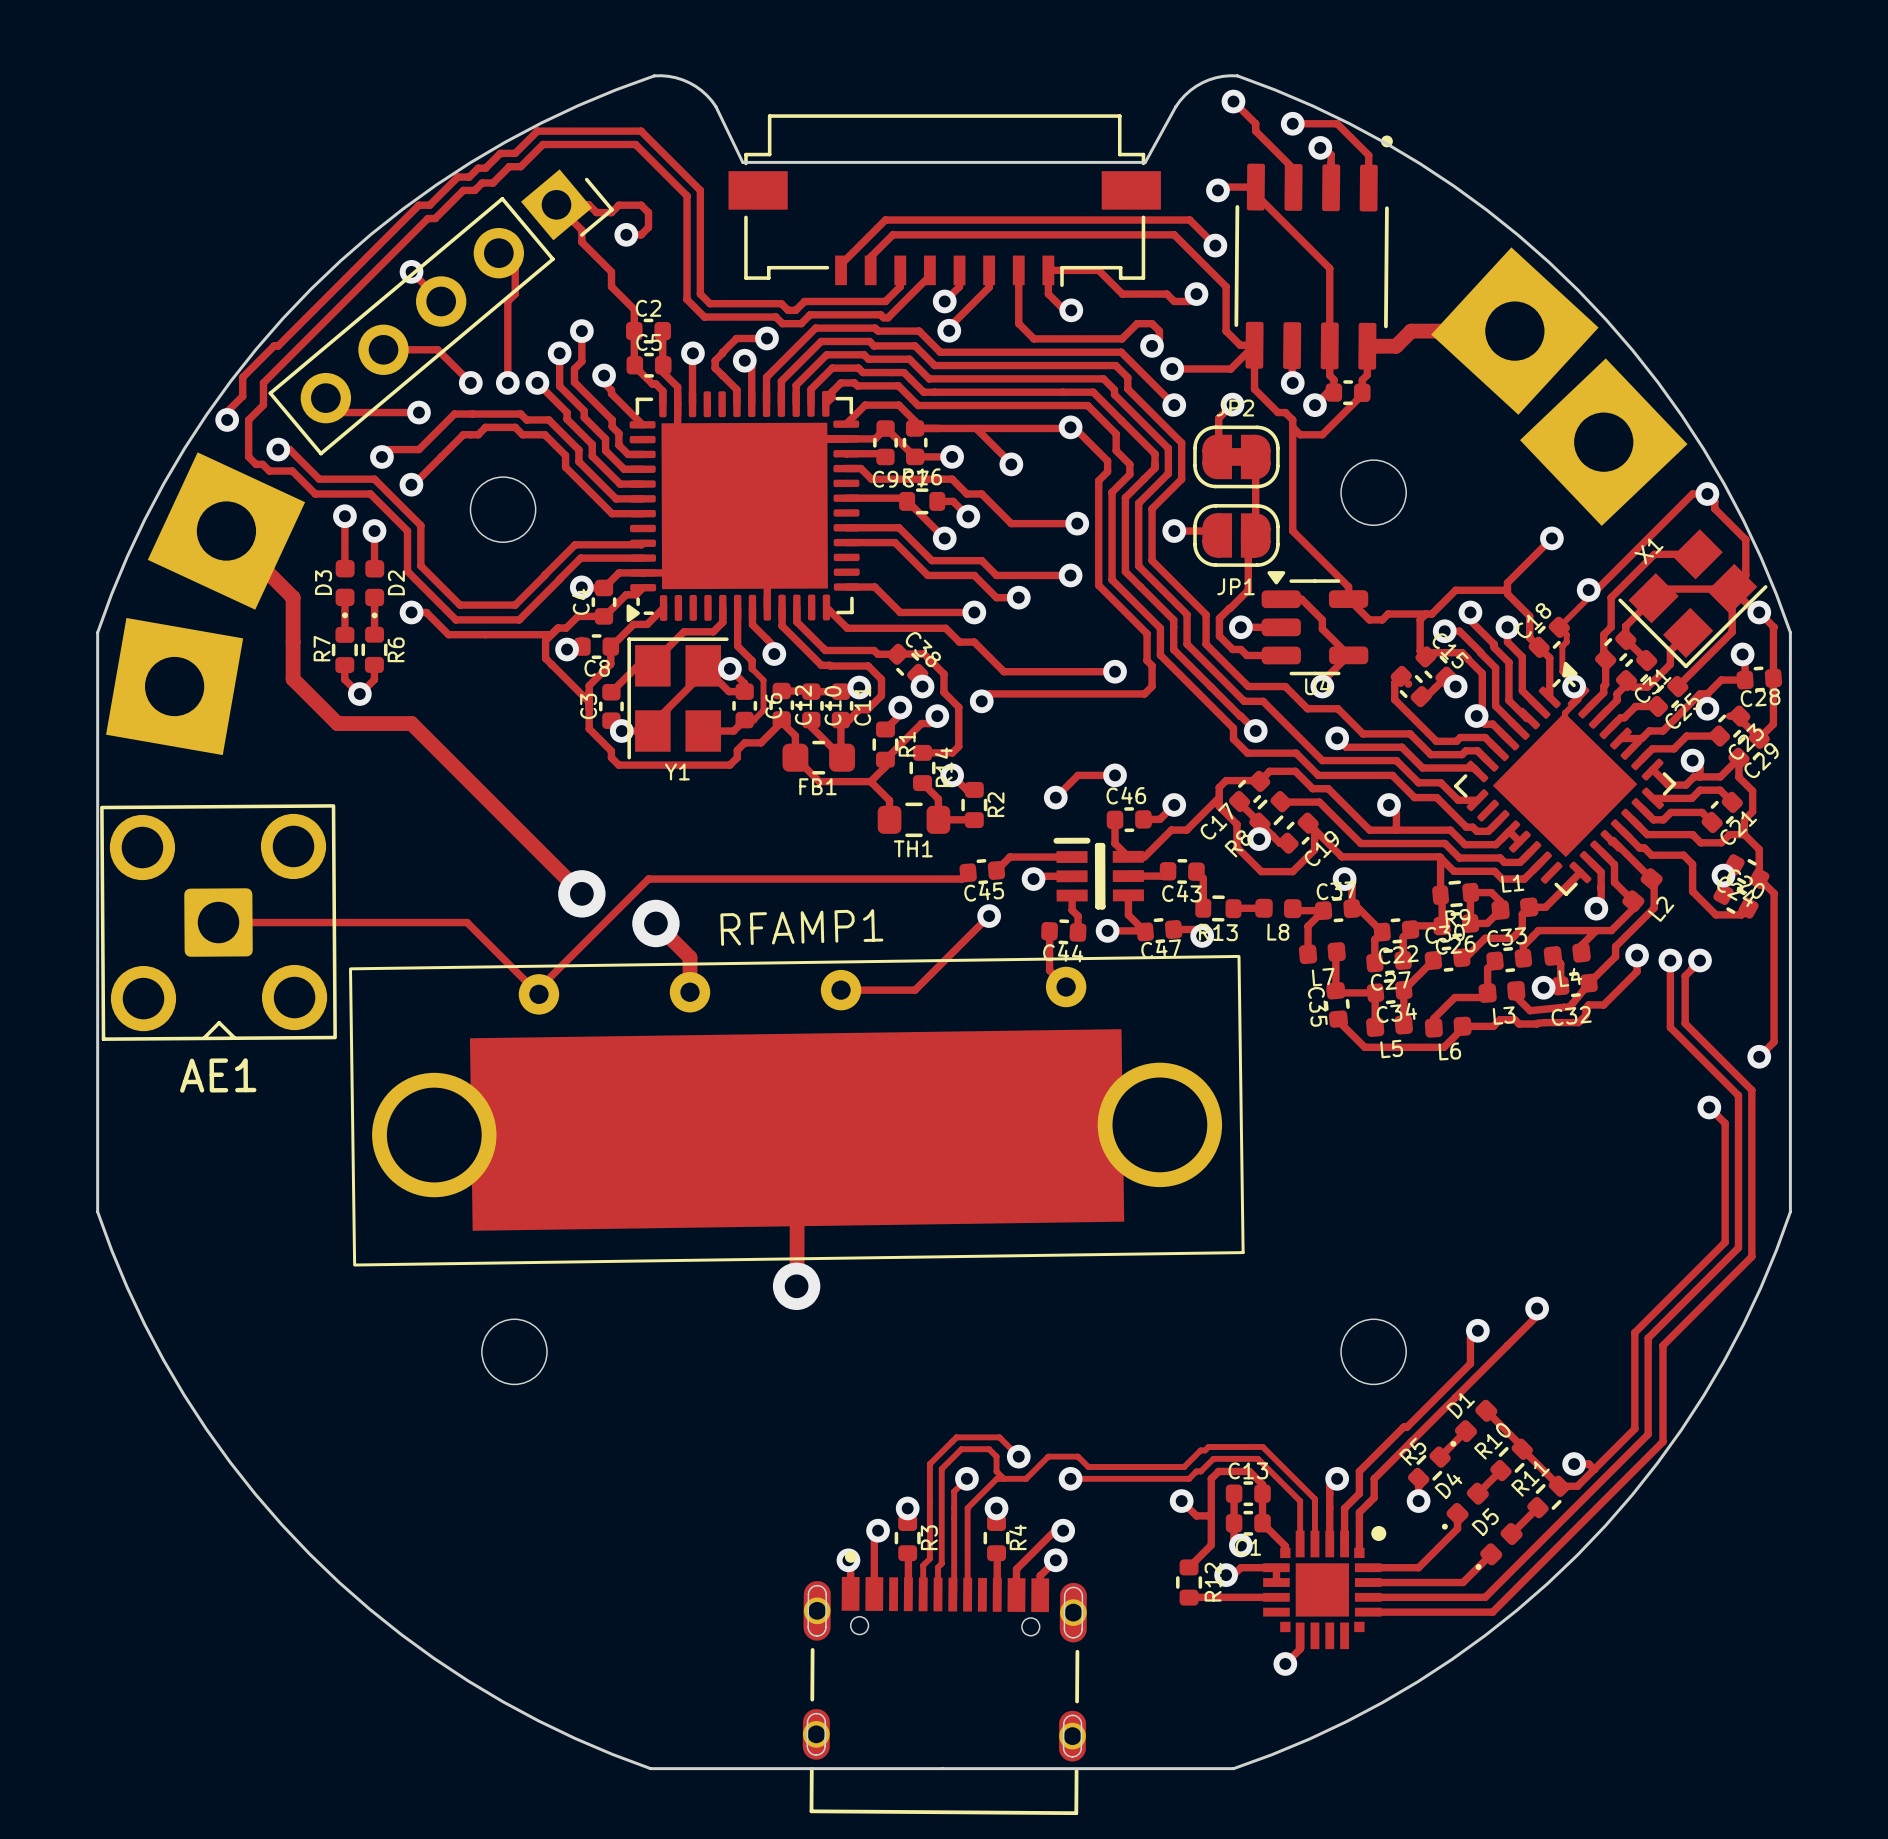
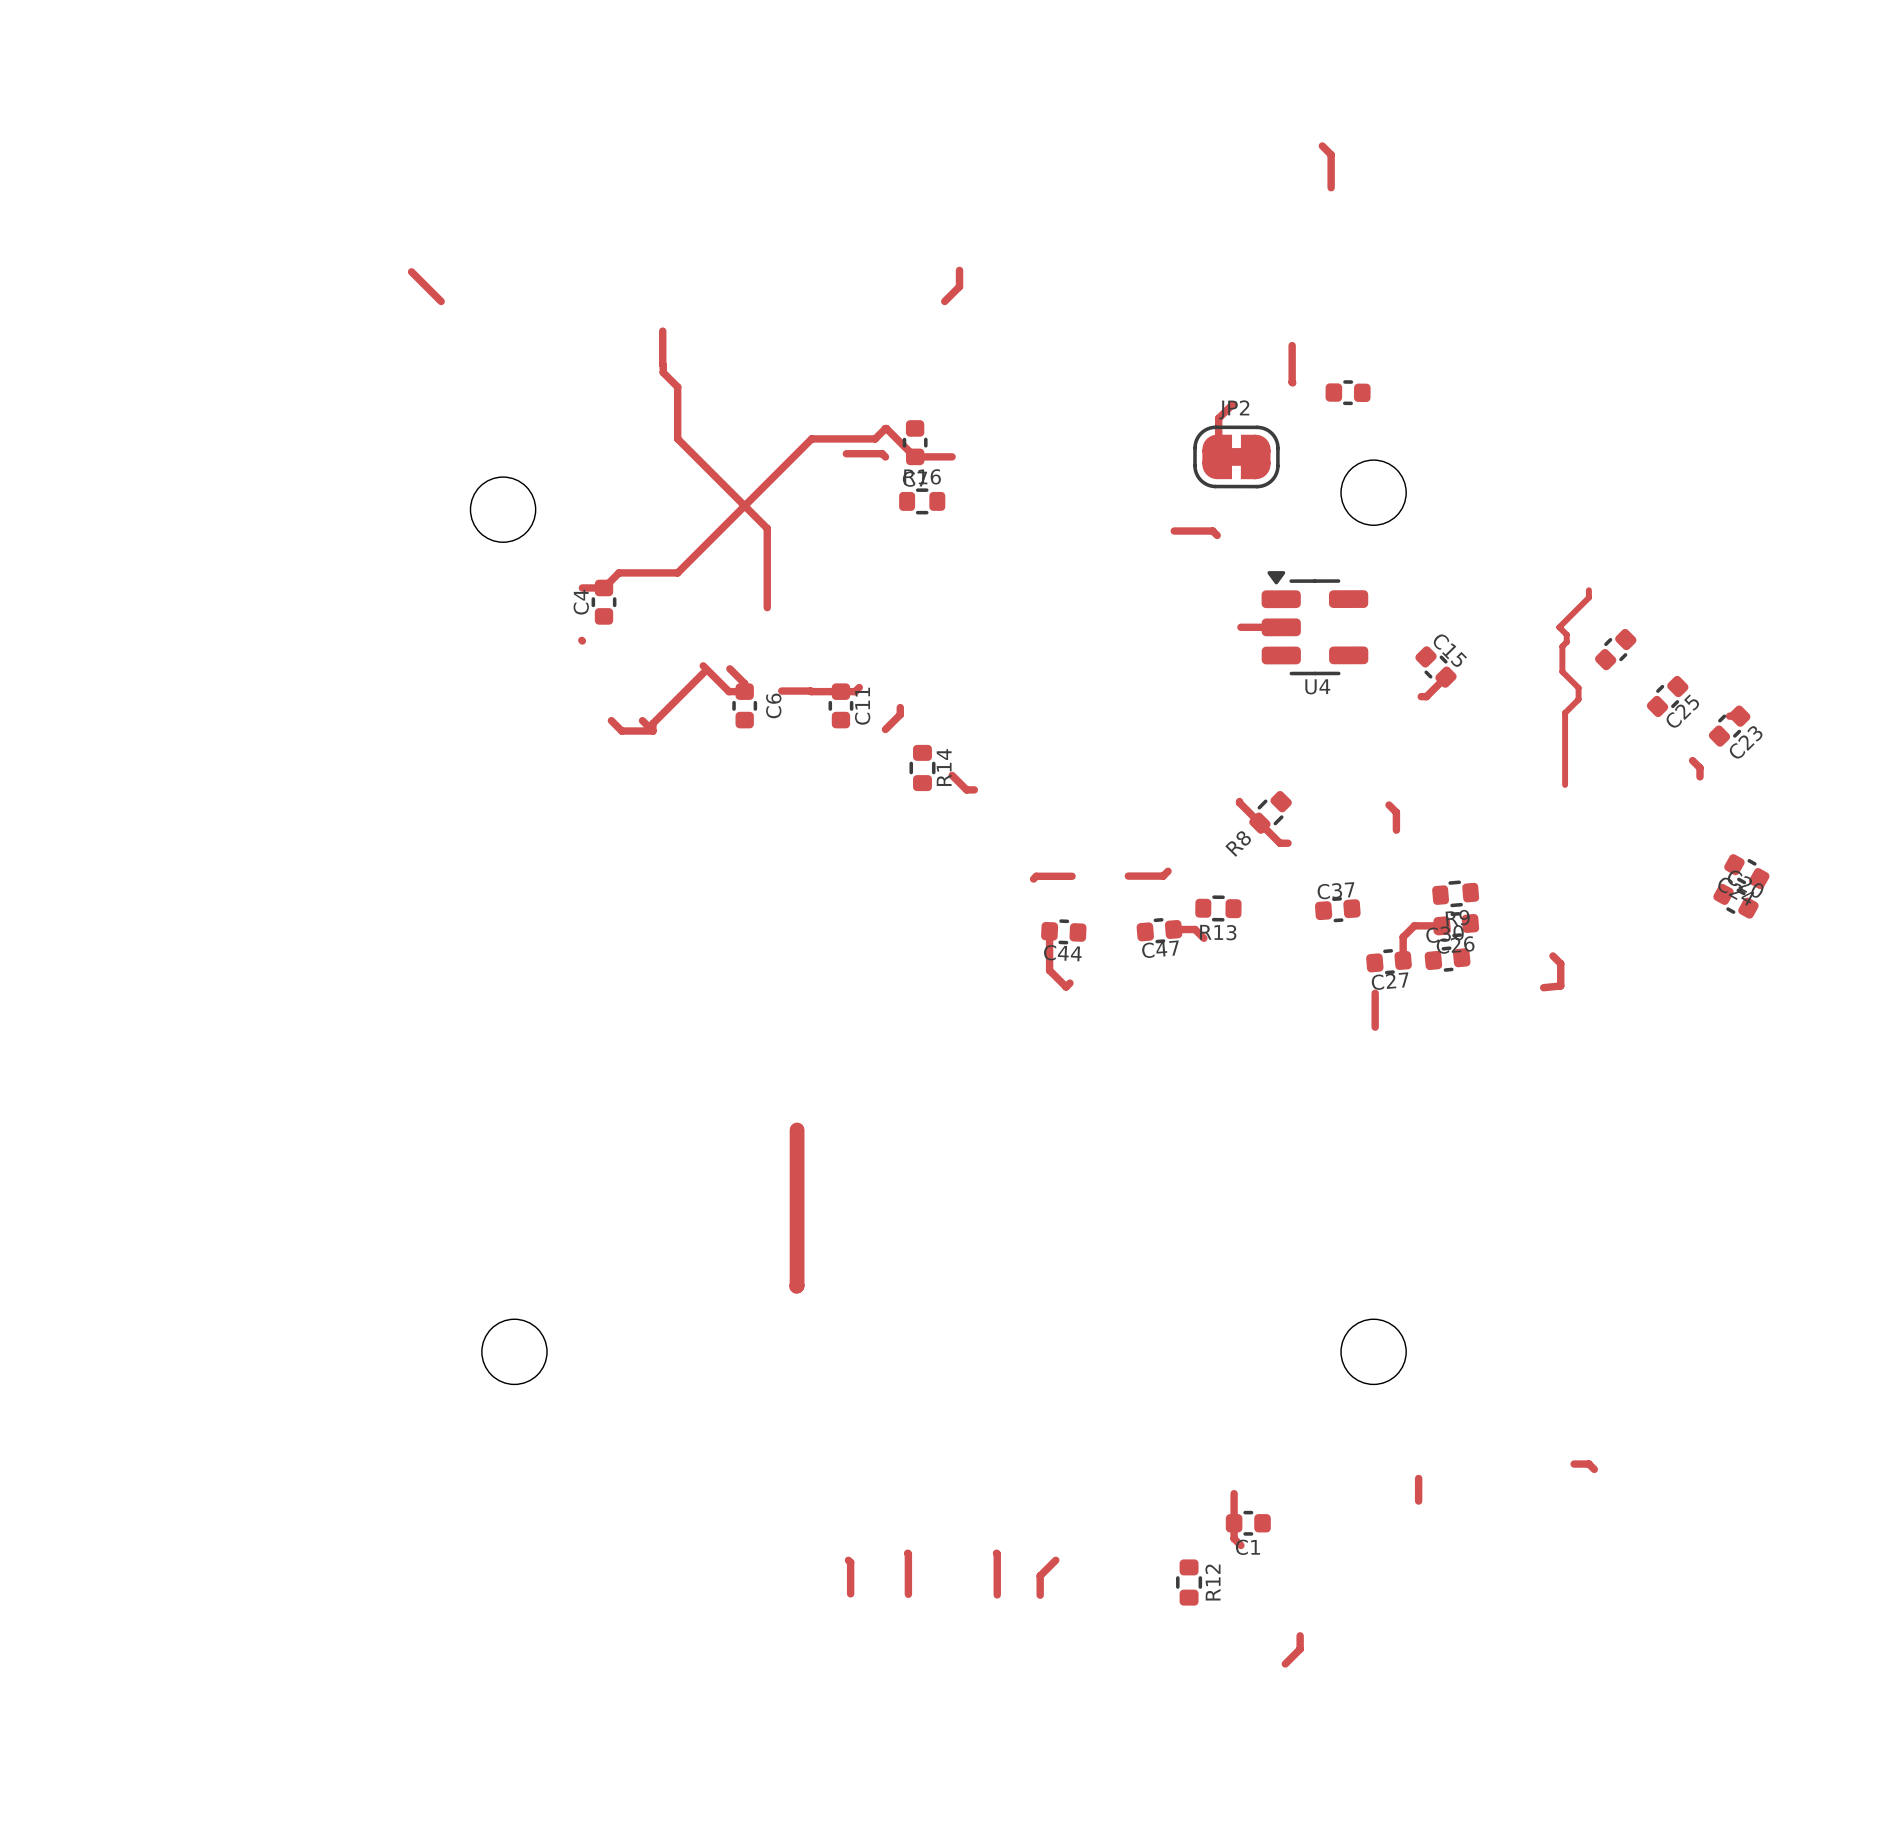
board edge: (654, 75) (578, 105) (541, 122) (470, 162) (403, 208) (340, 261) (282, 318) (230, 381) (184, 448) (144, 519) (127, 556) (97, 632) (97, 1211) (127, 1287) (163, 1360) (206, 1429) (255, 1494) (309, 1554) (369, 1609) (401, 1634) (467, 1680) (538, 1720) (612, 1754) (650, 1768) (1233, 1768) (1309, 1739) (1346, 1721) (1417, 1681) (1484, 1635) (1547, 1583) (1605, 1525) (1657, 1463) (1703, 1395) (1743, 1324) (1776, 1250) (1790, 1211) (1790, 632) (1760, 556) (1724, 484) (1681, 415) (1632, 350) (1578, 290) (1548, 262) (1486, 210) (1420, 163) (1349, 123) (1275, 90) (1237, 75) (1230, 75) (1209, 79) (1196, 86) (1184, 95) (1175, 106) (1145, 162) (742, 162) (715, 106) (706, 95) (695, 86) (682, 79) (668, 76) (654, 75) -> none
track: (1233, 101) (1255, 123) (1255, 131) (1293, 168) (1293, 187) -> none
via: (1233, 101) -> none
track: (1292, 123) (1337, 123) (1368, 155) (1368, 188) -> none
via: (1292, 123) -> none
via: (1320, 147) -> none
via: (1217, 190) -> none
track: (1218, 190) (1222, 187) (1255, 187) (1255, 194) (1329, 268) (1329, 375) (1333, 379) (1333, 392) (1327, 392) (1314, 405) -> none
part: (944, 200) -> none
track: (626, 234) (641, 234) (648, 227) (648, 212) (641, 205) (618, 205) (611, 212) (596, 212) (588, 204) (556, 204) (581, 230) (581, 242) (611, 271) (611, 286) (634, 309) (634, 366) (652, 384) (655, 384) (662, 391) (662, 404) -> none
via: (626, 234) -> none
track: (1215, 245) (1189, 220) (885, 220) (841, 264) (841, 270) -> none
via: (1215, 245) -> none
part: (1313, 252) -> none
track: (498, 253) (515, 269) (515, 294) (507, 301) (507, 382) (500, 382) -> none
track: (870, 270) (870, 257) (892, 234) (1174, 234) (1226, 286) (1226, 331) (1240, 345) (1254, 345) -> none
track: (900, 270) (900, 286) (885, 301) (804, 301) (795, 310) (788, 310) (781, 303) (709, 303) (700, 294) (700, 190) (641, 131) (537, 131) (515, 153) (500, 153) (485, 168) (478, 168) (469, 177) (457, 177) (429, 205) (418, 205) (278, 345) (274, 345) (242, 377) (242, 396) (226, 412) (227, 419) -> none
track: (929, 270) (929, 275) (888, 317) (883, 317) (880, 314) (810, 314) (801, 323) (782, 323) (775, 317) (704, 317) (687, 299) (687, 195) (635, 144) (542, 144) (520, 166) (509, 166) (493, 183) (482, 183) (474, 190) (463, 190) (435, 218) (427, 218) (263, 382) (263, 405) (248, 419) (248, 456) (256, 464) (262, 464) (269, 471) (292, 471) (315, 494) (370, 494) (407, 531) (407, 571) (455, 619) (519, 619) (580, 558) (643, 558) -> none
track: (989, 270) (989, 287) (949, 327) (949, 330) -> none
track: (1018, 270) (1018, 323) (1033, 338) (1122, 338) (1137, 323) (1152, 323) (1159, 331) (1159, 338) (1152, 345) -> none
via: (411, 271) -> none
track: (1196, 294) (1189, 301) (1174, 301) (1166, 294) (1122, 294) (1098, 270) (1048, 270) (1048, 294) (1063, 308) (1070, 308) -> none
via: (1196, 294) -> none
via: (944, 301) -> none
via: (1071, 310) -> none
part: (441, 312) -> none
via: (949, 330) -> none
track: (581, 331) (581, 361) (574, 368) (574, 382) (612, 419) (612, 426) (618, 433) (618, 445) (628, 454) (642, 454) -> none
via: (581, 331) -> none
C2: (648, 331) -> none
track: (1514, 331) (1411, 331) (1396, 346) (1367, 346) (1367, 374) (1362, 380) (1362, 394) (1322, 434) (1300, 434) (1292, 427) -> none
part: (1514, 331) -> none
track: (766, 338) (736, 338) (715, 360) (715, 368) (736, 389) (736, 404) -> none
via: (766, 338) -> none
via: (1152, 345) -> none
track: (1254, 345) (1254, 389) (1277, 412) (1285, 412) (1292, 419) (1292, 531) (1348, 586) (1348, 599) (1369, 619) (1382, 619) (1388, 614) (1431, 614) (1455, 590) (1507, 590) -> none
track: (1254, 345) (1230, 368) (1172, 368) -> none
track: (383, 349) (437, 349) (470, 382) -> none
track: (559, 353) (559, 386) (584, 410) (584, 417) (605, 438) (605, 450) (624, 469) (642, 469) -> none
via: (559, 353) -> none
track: (692, 353) (692, 404) -> none
via: (692, 353) -> none
track: (744, 360) (751, 367) (751, 404) -> none
via: (744, 360) -> none
C5: (649, 365) -> none
via: (1172, 368) -> none
track: (604, 375) (604, 382) (611, 390) (611, 393) (642, 424) -> none
via: (604, 375) -> none
via: (470, 382) -> none
via: (507, 382) -> none
track: (537, 382) (567, 412) (567, 419) (592, 444) (592, 456) (620, 484) (642, 484) -> none
via: (537, 382) -> none
via: (1292, 382) -> none
track: (325, 398) (340, 412) (418, 412) -> none
track: (781, 403) (781, 381) (821, 341) (869, 341) (874, 345) (915, 345) (934, 365) (1115, 365) (1127, 377) (1127, 389) (1181, 442) (1181, 479) (1152, 508) (1152, 560) (1206, 614) (1206, 644) (1248, 686) (1285, 686) (1307, 708) (1337, 708) (1363, 733) (1410, 733) (1430, 754) (1462, 754) (1465, 750) (1477, 750) (1487, 760) -> none
track: (796, 403) (796, 385) (826, 354) (864, 354) (868, 359) (909, 359) (929, 378) (1103, 378) (1114, 389) (1114, 394) (1168, 448) (1168, 473) (1138, 503) (1138, 566) (1187, 614) (1187, 644) (1244, 701) (1263, 701) (1322, 760) (1396, 760) (1418, 782) (1440, 782) (1458, 800) (1477, 800) -> none
track: (810, 403) (810, 389) (832, 368) (858, 368) (862, 372) (904, 372) (923, 392) (1093, 392) (1155, 453) (1155, 468) (1125, 497) (1125, 571) (1173, 620) (1173, 649) (1255, 730) -> none
track: (825, 403) (831, 397) (831, 392) (841, 382) (854, 382) (857, 385) (898, 385) (918, 405) (1087, 405) (1116, 433) (1116, 450) (1129, 464) (1129, 474) (1112, 492) (1112, 579) (1160, 628) (1160, 655) (1233, 728) (1233, 739) (1247, 753) (1296, 753) (1318, 775) (1392, 775) (1414, 797) (1436, 797) (1466, 827) (1472, 827) (1476, 831) (1488, 831) (1498, 820) -> none
track: (766, 404) (766, 377) (815, 328) (875, 328) (878, 331) (919, 331) (940, 352) (1121, 352) (1174, 405) -> none
via: (1232, 404) -> none
via: (1174, 405) -> none
via: (1314, 405) -> none
via: (418, 412) -> none
via: (227, 419) -> none
track: (846, 424) (865, 405) (898, 405) (915, 421) (915, 428) (1073, 427) (1107, 461) (1107, 471) (1098, 480) (1098, 585) (1147, 633) (1147, 660) (1152, 665) (1152, 686) (1144, 693) (989, 693) (981, 701) -> none
via: (1070, 427) -> none
track: (976, 428) (1011, 464) -> none
C9: (885, 442) -> none
part: (1603, 442) -> none
track: (278, 449) (289, 449) (319, 479) (374, 479) (420, 525) (420, 565) (460, 605) (515, 605) (575, 544) (643, 543) -> none
via: (278, 449) -> none
track: (381, 456) (389, 449) (418, 449) (454, 414) (520, 414) (526, 419) (548, 419) (578, 449) (578, 461) (616, 498) (642, 498) -> none
via: (381, 456) -> none
via: (952, 456) -> none
track: (1255, 456) (1255, 535) (1248, 542) (1248, 590) (1219, 618) (1219, 636) (1232, 649) (1240, 649) (1246, 655) (1281, 655) -> none
via: (1011, 464) -> none
track: (846, 468) (860, 468) (871, 479) (952, 479) (966, 494) (981, 494) (1011, 523) (1077, 523) -> none
via: (411, 484) -> none
track: (411, 486) (463, 434) (478, 434) (485, 427) (515, 427) (522, 434) (544, 434) (565, 455) (565, 467) (612, 513) (642, 513) -> none
via: (1707, 494) -> none
track: (846, 498) (903, 498) (907, 501) -> none
track: (907, 501) (944, 538) -> none
track: (937, 501) (953, 501) (968, 516) -> none
part: (743, 506) -> none
track: (344, 516) (344, 568) -> none
via: (344, 516) -> none
via: (968, 516) -> none
via: (1077, 523) -> none
track: (846, 527) (899, 527) (931, 560) (981, 560) (996, 575) (1070, 575) -> none
track: (226, 531) (293, 597) (293, 679) (337, 723) (411, 723) (581, 893) -> none
part: (226, 531) -> none
track: (374, 531) (374, 568) -> none
via: (374, 531) -> none
via: (1174, 531) -> none
JP1: (1236, 535) -> none
via: (944, 538) -> none
track: (1551, 538) (1507, 582) (1507, 593) (1529, 616) (1529, 637) (1549, 657) (1549, 697) -> none
via: (1551, 538) -> none
track: (846, 542) (895, 542) (927, 575) (974, 575) (996, 597) (1018, 597) -> none
track: (1697, 554) (1654, 554) (1611, 597) (1611, 627) (1603, 634) (1605, 684) (1603, 692) (1589, 707) -> none
via: (1070, 575) -> none
via: (581, 587) -> none
track: (643, 587) (636, 594) (626, 594) (604, 616) (577, 616) (566, 628) (558, 628) (545, 640) (545, 658) (589, 702) -> none
track: (846, 587) (874, 587) (900, 612) (974, 612) -> none
D3: (345, 589) -> none
D2: (374, 589) -> none
track: (1588, 590) (1596, 590) (1692, 494) (1707, 494) (1714, 501) (1714, 508) (1745, 539) (1745, 575) (1732, 589) (1662, 589) (1625, 626) (1625, 639) (1646, 660) -> none
via: (1588, 590) -> none
track: (345, 597) (344, 634) -> none
track: (374, 597) (374, 634) -> none
via: (1018, 597) -> none
X1: (1692, 598) -> none
track: (1281, 599) (1301, 599) (1322, 619) (1322, 629) (1348, 655) (1322, 681) (1322, 686) -> none
track: (722, 607) (722, 622) (713, 631) (683, 631) (652, 662) -> none
track: (737, 607) (737, 646) (752, 660) (752, 668) (763, 680) (763, 710) (753, 720) (744, 720) (733, 731) (703, 731) -> none
track: (752, 607) (752, 624) (774, 646) (774, 654) -> none
track: (782, 607) (782, 625) (821, 665) (868, 666) (881, 679) (881, 695) (867, 709) (859, 709) (848, 720) (840, 720) (840, 756) -> none
track: (796, 607) (796, 621) (825, 650) (874, 650) (877, 654) (897, 654) -> none
track: (826, 607) (847, 628) (945, 628) (959, 642) (974, 642) (1003, 671) (1115, 671) -> none
track: (663, 608) (647, 624) (633, 624) (611, 646) -> none
track: (411, 612) (426, 612) (448, 634) (551, 634) -> none
via: (411, 612) -> none
via: (974, 612) -> none
track: (1470, 612) (1470, 620) (1508, 662) (1508, 700) (1529, 718) -> none
via: (1470, 612) -> none
via: (1759, 612) -> none
track: (1426, 614) (1420, 619) (1420, 651) (1426, 656) (1430, 652) (1462, 652) (1468, 658) -> none
via: (1240, 627) -> none
track: (1507, 627) (1507, 642) (1522, 656) (1522, 690) (1539, 707) -> none
via: (1507, 627) -> none
track: (1444, 631) (1459, 631) (1495, 667) (1495, 706) (1518, 729) -> none
via: (1444, 631) -> none
track: (1688, 632) (1670, 650) (1670, 664) (1647, 687) (1633, 687) (1626, 680) (1626, 684) (1617, 693) (1617, 700) (1599, 717) -> none
C18: (1549, 637) -> none
C8: (596, 646) -> none
track: (610, 646) (610, 664) (589, 685) (589, 728) (611, 751) (611, 757) (618, 765) (729, 765) (737, 757) (737, 750) (744, 742) (760, 742) (781, 722) (795, 735) (795, 757) (819, 781) (870, 781) -> none
R7: (344, 649) -> none
R6: (374, 649) -> none
via: (567, 649) -> none
via: (774, 654) -> none
track: (897, 654) (923, 654) (943, 674) (943, 692) (958, 707) (958, 746) (952, 752) (922, 752) -> none
track: (1742, 654) (1745, 656) (1745, 680) (1721, 680) (1707, 693) -> none
via: (1742, 654) -> none
track: (1468, 659) (1482, 673) (1482, 710) (1476, 716) (1484, 724) (1492, 724) (1508, 739) -> none
track: (374, 664) (374, 679) (359, 694) (344, 679) (345, 665) -> none
C38: (907, 664) -> none
track: (637, 665) (611, 692) -> none
via: (729, 668) -> none
C31: (1636, 670) -> none
via: (1115, 671) -> none
track: (1401, 676) (1394, 682) (1394, 699) (1436, 741) (1456, 741) (1460, 737) (1485, 737) (1497, 750) -> none
C28: (1759, 679) -> none
part: (174, 686) -> none
via: (922, 686) -> none
via: (1322, 686) -> none
part: (1411, 686) -> none
via: (1455, 686) -> none
via: (1574, 686) -> none
track: (1677, 686) (1732, 632) (1732, 588) (1774, 627) (1773, 724) (1759, 738) (1739, 718) (1739, 716) -> none
via: (859, 687) -> none
track: (1707, 693) (1700, 693) (1662, 730) (1649, 730) (1641, 738) (1620, 738) -> none
via: (359, 694) -> none
Y1: (678, 698) -> none
via: (981, 701) -> none
C12: (781, 705) -> none
C10: (811, 705) -> none
C3: (611, 706) -> none
track: (1657, 706) (1635, 706) (1610, 728) -> none
via: (900, 707) -> none
via: (1707, 708) -> none
track: (937, 716) (929, 723) (921, 723) (885, 759) (885, 766) (870, 781) -> none
via: (937, 716) -> none
via: (1476, 716) -> none
track: (811, 720) (811, 726) (842, 757) -> none
via: (1255, 730) -> none
via: (621, 731) -> none
track: (1719, 736) (1686, 736) (1673, 748) (1652, 748) (1642, 759) -> none
track: (1337, 738) (1346, 747) (1401, 747) (1422, 767) (1473, 767) (1477, 771) -> none
via: (1337, 738) -> none
R1: (885, 744) -> none
C29: (1749, 748) -> none
FB1: (818, 757) -> none
via: (1692, 760) -> none
track: (1652, 769) (1668, 785) (1685, 785) (1694, 776) (1720, 776) (1738, 758) (1738, 777) (1752, 790) (1752, 811) (1744, 819) (1744, 834) -> none
via: (952, 775) -> none
track: (1115, 775) (1078, 775) (1055, 797) -> none
via: (1115, 775) -> none
part: (1565, 778) -> none
track: (870, 781) (889, 800) (889, 819) -> none
track: (1259, 781) (1269, 771) (1295, 771) (1312, 788) (1328, 788) (1369, 830) (1450, 830) (1465, 844) (1495, 844) (1509, 831) (1519, 841) -> none
track: (1259, 781) (1226, 780) (1219, 787) (1219, 806) (1236, 824) (1236, 847) (1261, 871) (1292, 871) (1314, 849) (1314, 829) -> none
track: (922, 783) (938, 799) (938, 819) (974, 819) -> none
C17: (1249, 791) -> none
via: (1055, 797) -> none
track: (1219, 797) (1186, 830) (1171, 830) (1144, 856) (1128, 856) (1115, 843) (1115, 819) -> none
track: (1652, 798) (1691, 798) (1700, 790) (1720, 790) (1732, 802) -> none
track: (1281, 802) (1319, 802) (1360, 843) (1445, 843) (1459, 857) (1500, 857) (1504, 862) (1520, 862) (1530, 852) -> none
R2: (974, 805) -> none
track: (1174, 805) (1159, 819) (1143, 819) -> none
via: (1174, 805) -> none
via: (1389, 805) -> none
track: (1642, 808) (1653, 819) (1663, 819) (1670, 812) (1702, 812) (1712, 822) -> none
C21: (1722, 812) -> none
TH1: (913, 819) -> none
C46: (1129, 819) -> none
track: (1632, 819) (1647, 834) (1692, 834) (1700, 842) (1721, 842) (1729, 834) (1744, 834) -> none
track: (1308, 823) (1341, 856) (1439, 856) (1453, 871) (1494, 871) (1502, 879) (1524, 879) (1541, 862) -> none
track: (1621, 830) (1639, 848) (1644, 848) (1651, 855) (1683, 855) (1692, 864) (1692, 891) (1715, 914) (1741, 914) (1748, 908) -> none
C19: (1298, 833) -> none
track: (1744, 834) (1759, 849) (1759, 878) (1774, 893) (1774, 1041) (1759, 1056) -> none
via: (1259, 839) -> none
track: (1611, 842) (1613, 840) (1651, 879) (1654, 885) (1654, 908) (1615, 946) (1615, 956) (1584, 988) -> none
track: (1601, 851) (1614, 864) (1614, 882) (1633, 901) (1633, 908) (1611, 930) (1538, 930) (1523, 946) (1523, 958) -> none
track: (1072, 857) (1009, 857) (996, 870) -> none
track: (1440, 857) (1442, 925) -> none
track: (1590, 861) (1601, 872) (1601, 906) (1596, 910) (1596, 908) (1598, 908) -> none
C45: (982, 871) -> none
C43: (1182, 871) -> none
track: (1196, 871) (1203, 878) (1203, 908) -> none
track: (968, 872) (961, 879) (648, 879) (538, 988) (538, 994) (467, 922) (218, 922) -> none
track: (1580, 872) (1545, 907) (1529, 907) (1522, 914) (1522, 928) (1512, 938) (1485, 938) (1465, 957) (1461, 957) -> none
part: (1098, 873) -> none
via: (1723, 875) -> none
via: (1033, 879) -> none
track: (1344, 879) (1351, 886) (1351, 908) (1358, 908) (1382, 932) (1374, 939) (1374, 962) -> none
via: (1344, 879) -> none
L2: (1642, 890) -> none
track: (1470, 892) (1491, 892) (1500, 901) (1500, 910) (1487, 923) (1470, 923) (1470, 892) -> none
via: (581, 893) -> none
track: (1072, 895) (1072, 910) (1078, 916) (1078, 932) -> none
track: (1128, 895) (1128, 915) (1145, 931) -> none
track: (1233, 908) (1264, 908) -> none
L8: (1278, 908) -> none
track: (1292, 908) (1294, 910) (1323, 910) (1308, 926) (1308, 954) -> none
L1: (1514, 908) -> none
via: (1596, 908) -> none
track: (989, 916) (915, 990) (841, 990) -> none
via: (989, 916) -> none
AE1: (218, 922) -> none
track: (655, 923) (690, 957) (690, 992) -> none
via: (655, 923) -> none
track: (1107, 930) (1144, 930) -> none
via: (1107, 930) -> none
C22: (1396, 930) -> none
track: (1596, 930) (1581, 945) (1581, 952) -> none
via: (1202, 935) -> none
track: (1336, 951) (1335, 990) -> none
L7: (1322, 953) -> none
L4: (1567, 954) -> none
track: (1637, 955) (1637, 971) (1603, 1004) (1588, 1004) (1585, 1008) (1585, 1015) (1578, 1022) (1519, 1024) (1514, 1019) (1500, 1019) (1493, 1026) (1462, 1026) (1462, 1028) (1443, 1047) (1364, 1047) (1338, 1019) -> none
via: (1637, 955) -> none
C33: (1509, 959) -> none
track: (1433, 960) (1403, 990) (1403, 1024) -> none
track: (1670, 960) (1670, 1027) (1738, 1095) (1738, 1247) (1648, 1338) (1648, 1434) (1485, 1597) (1368, 1597) -> none
via: (1670, 960) -> none
track: (1700, 960) (1685, 976) (1685, 1023) (1751, 1090) (1751, 1256) (1662, 1345) (1662, 1441) (1492, 1612) (1368, 1612) -> none
via: (1700, 960) -> none
track: (1495, 961) (1487, 968) (1487, 993) (1483, 997) (1454, 997) (1433, 1018) (1433, 1027) -> none
C32: (1574, 984) -> none
via: (1543, 987) -> none
track: (1584, 989) (1568, 1007) (1530, 1010) (1516, 996) (1516, 990) -> none
track: (1335, 990) (1338, 992) (1375, 992) -> none
C34: (1389, 991) -> none
L3: (1501, 991) -> none
C35: (1337, 1004) -> none
L5: (1389, 1025) -> none
L6: (1448, 1027) -> none
via: (1759, 1056) -> none
track: (1709, 1107) (1725, 1123) (1725, 1242) (1634, 1332) (1634, 1428) (1577, 1486) (1559, 1486) (1486, 1410) -> none
via: (1709, 1107) -> none
RFAMP1: (796, 1110) -> none
via: (796, 1286) -> none
track: (1537, 1308) (1537, 1315) (1374, 1478) (1374, 1497) (1359, 1512) (1359, 1552) -> none
via: (1537, 1308) -> none
track: (1477, 1330) (1470, 1338) (1470, 1363) (1359, 1471) (1359, 1493) (1344, 1508) (1344, 1544) -> none
via: (1477, 1330) -> none
D1: (1473, 1423) -> none
track: (1466, 1431) (1440, 1457) -> none
track: (1018, 1456) (999, 1437) (956, 1437) (929, 1464) (929, 1558) (923, 1565) (923, 1594) -> none
via: (1018, 1456) -> none
R10: (1511, 1459) -> none
via: (1574, 1464) -> none
R5: (1429, 1467) -> none
track: (1500, 1470) (1477, 1493) -> none
track: (966, 1478) (954, 1491) (952, 1594) -> none
via: (966, 1478) -> none
track: (1003, 1478) (996, 1471) (996, 1456) (989, 1449) (961, 1449) (941, 1468) (941, 1563) (938, 1567) (938, 1594) -> none
track: (1070, 1478) (1189, 1478) (1196, 1471) (1200, 1471) (1213, 1458) (1257, 1458) (1300, 1501) (1300, 1544) -> none
via: (1070, 1478) -> none
track: (1337, 1478) (1329, 1486) (1329, 1544) -> none
via: (1337, 1478) -> none
C13: (1248, 1493) -> none
R11: (1548, 1496) -> none
track: (1181, 1501) (1196, 1515) (1211, 1515) -> none
via: (1181, 1501) -> none
via: (1418, 1501) -> none
D4: (1465, 1506) -> none
track: (1537, 1507) (1511, 1534) -> none
via: (907, 1508) -> none
via: (996, 1508) -> none
track: (1457, 1513) (1457, 1528) (1418, 1567) (1368, 1567) -> none
track: (878, 1530) (874, 1534) (874, 1594) -> none
via: (878, 1530) -> none
track: (1063, 1530) (1055, 1530) (1016, 1569) (1016, 1595) -> none
via: (1063, 1530) -> none
R3: (907, 1538) -> none
R4: (996, 1538) -> none
track: (1314, 1544) (1314, 1499) (1262, 1447) (1208, 1447) (1205, 1450) (1200, 1450) (1184, 1467) (1088, 1467) (1078, 1456) (1048, 1456) (1026, 1478) (996, 1478) (967, 1508) (967, 1594) -> none
via: (1240, 1545) -> none
D5: (1499, 1546) -> none
track: (1285, 1552) (1285, 1546) (1262, 1523) (1262, 1484) (1249, 1471) (1218, 1471) (1211, 1478) (1211, 1545) (1189, 1567) -> none
track: (1491, 1554) (1463, 1582) (1368, 1582) -> none
via: (848, 1560) -> none
via: (1055, 1560) -> none
track: (1226, 1575) (1233, 1575) (1240, 1567) (1276, 1567) (1276, 1582) -> none
via: (1226, 1575) -> none
part: (1324, 1587) -> none
track: (1189, 1597) (1276, 1597) -> none
via: (1285, 1663) -> none
part: (944, 1682) -> none

